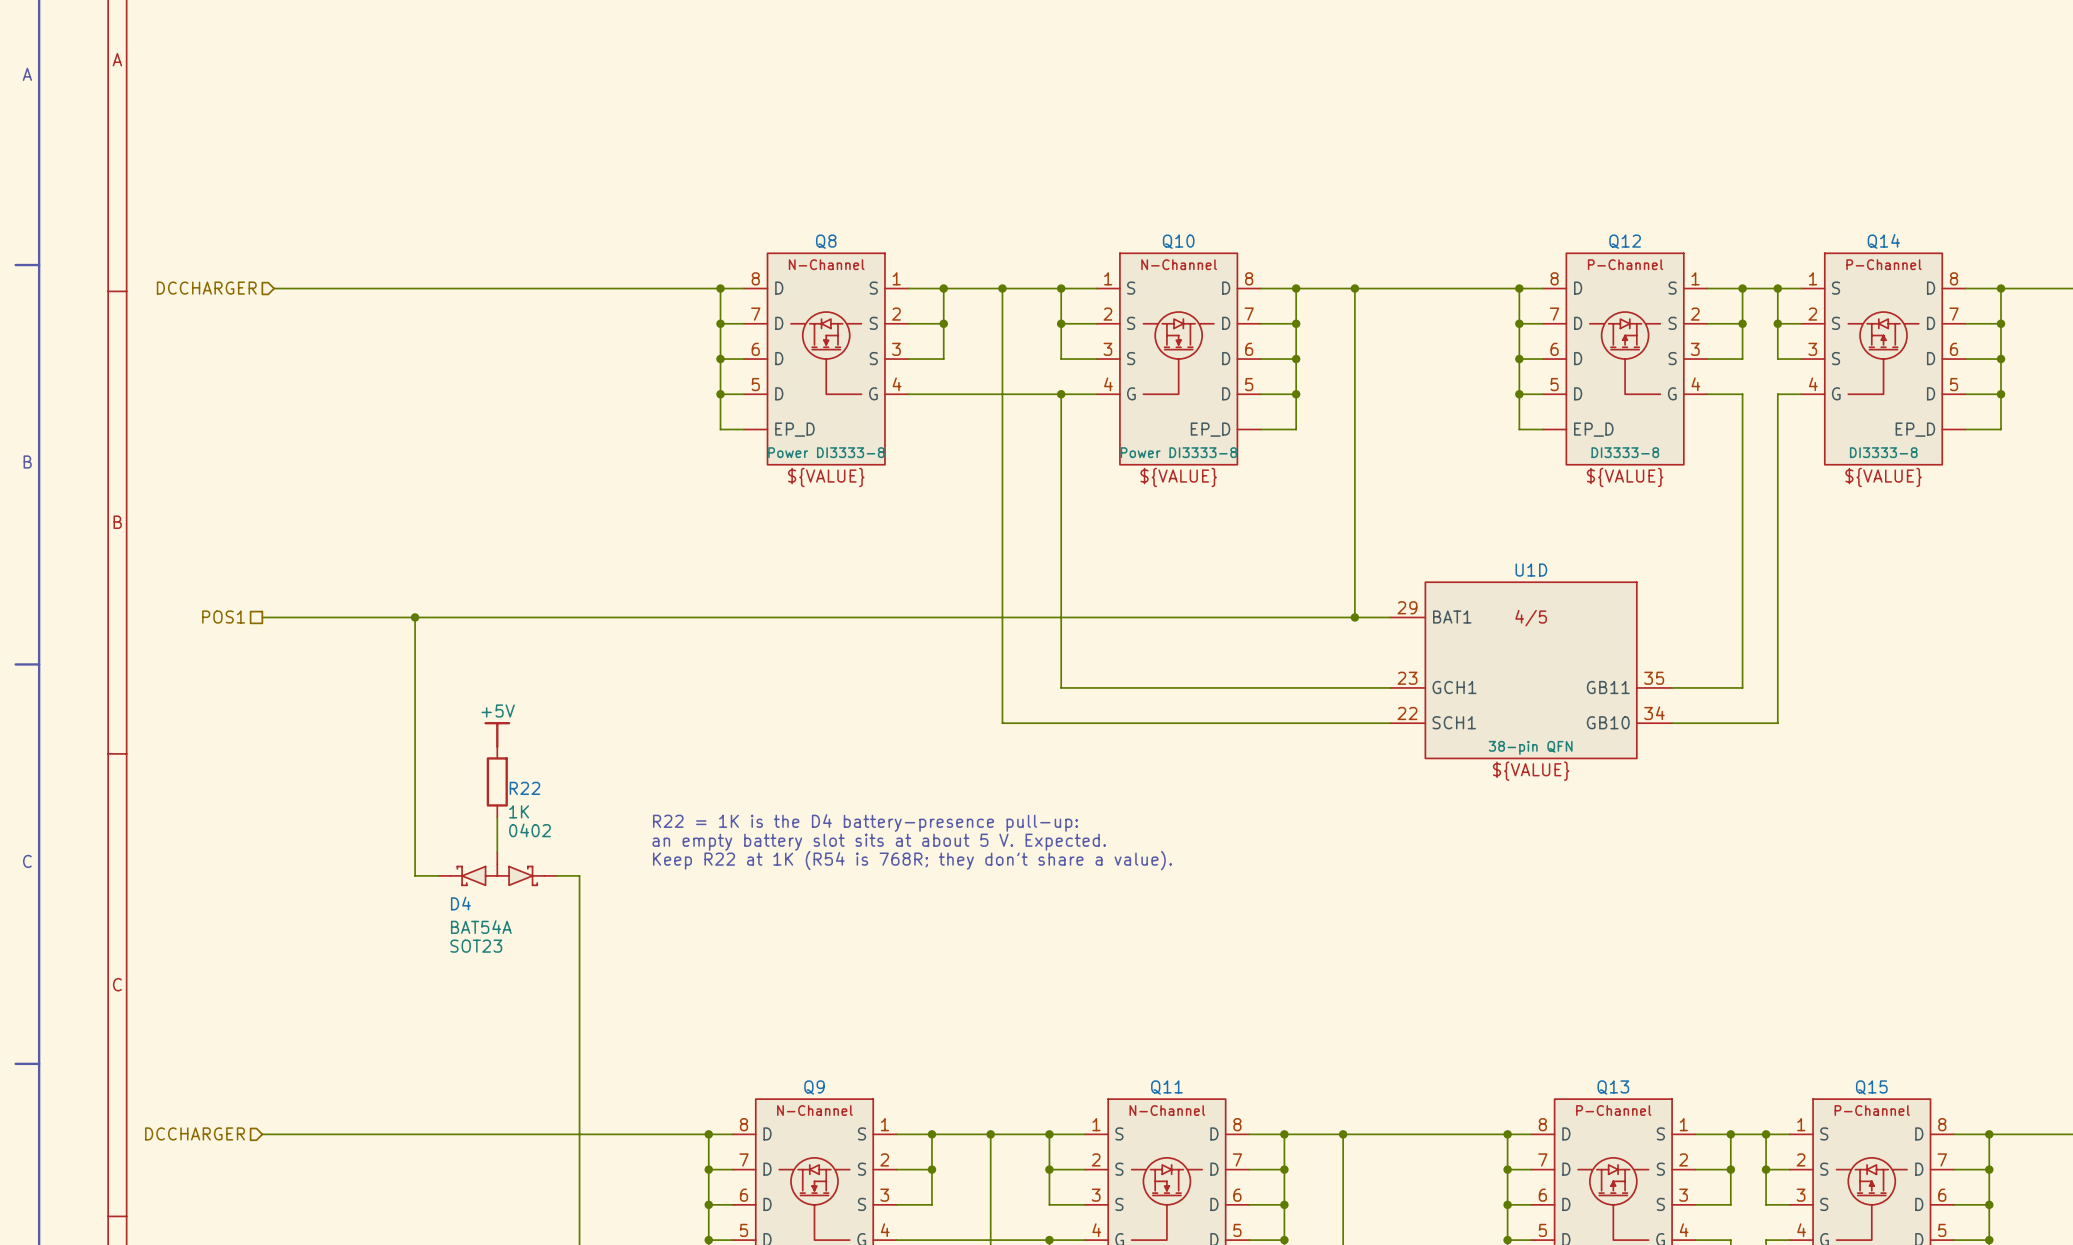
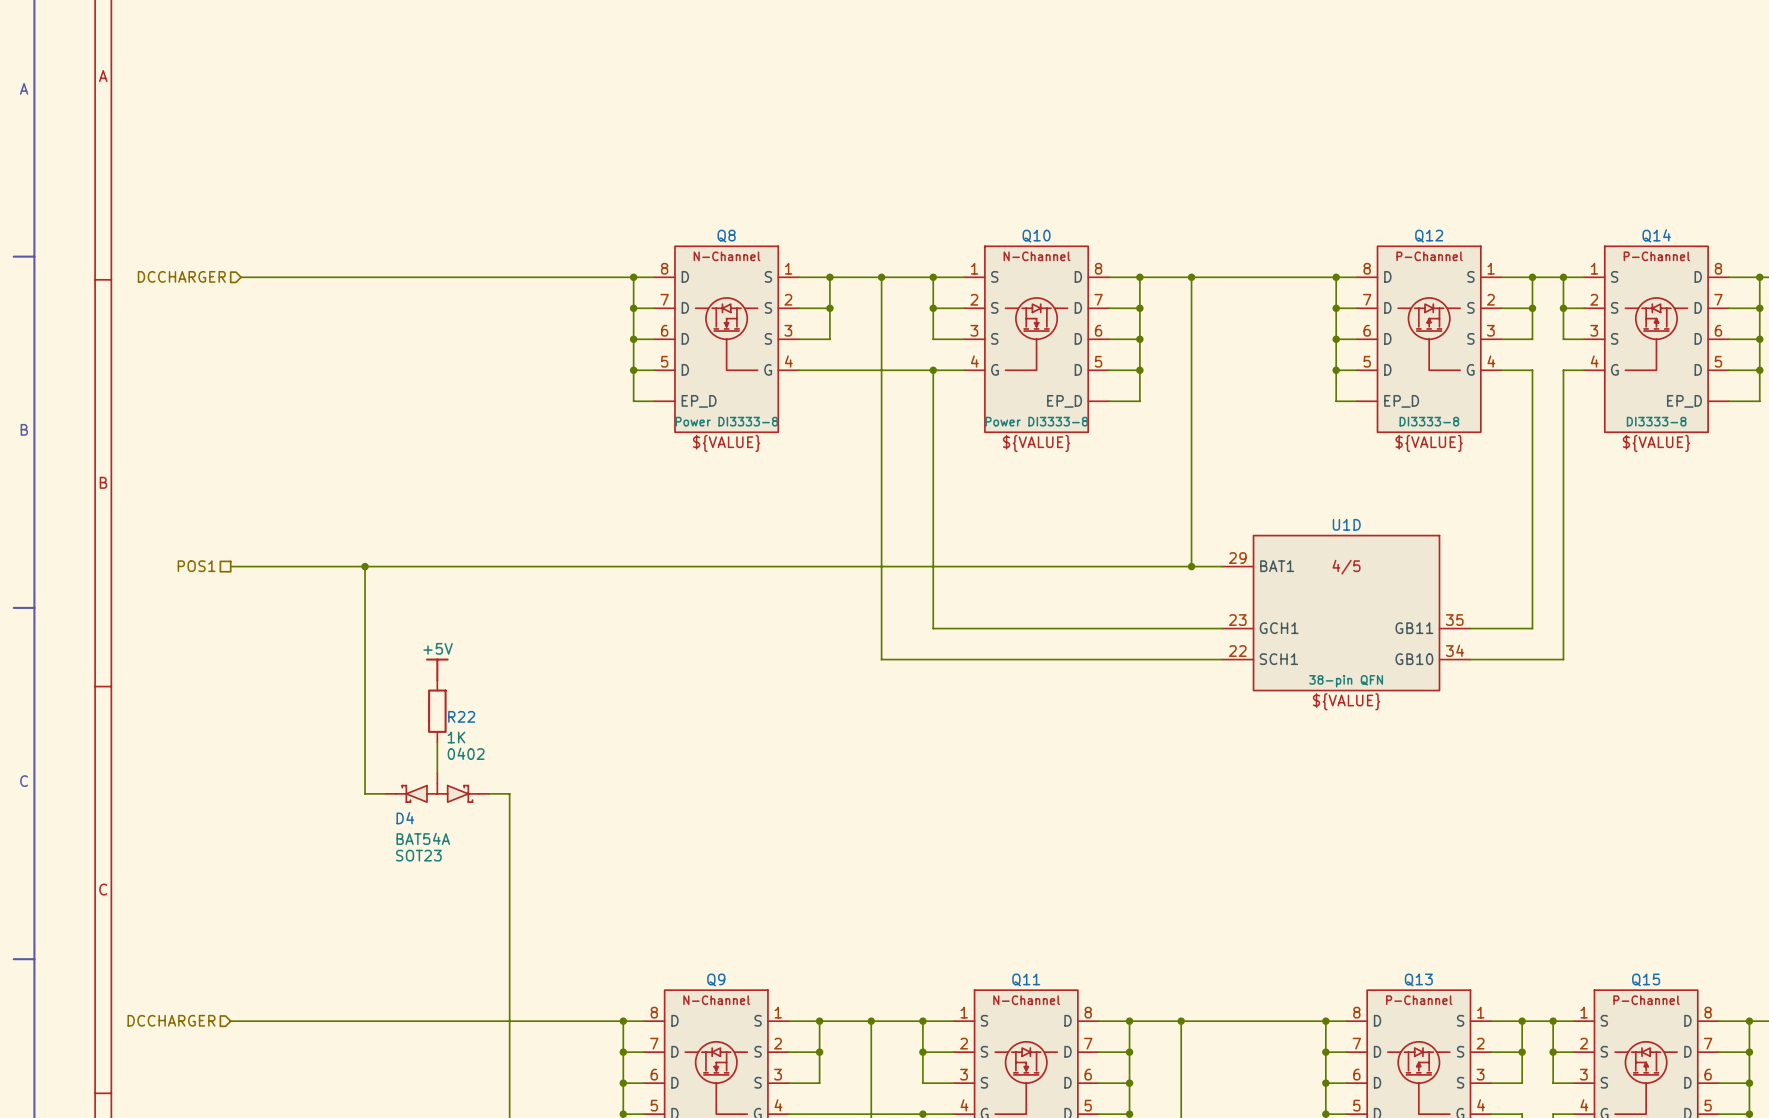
text: R22 = 1K is the D4 battery-presence pull-up: (865, 822) -> none
text: an empty battery slot sits at about 5 V. Expected. (879, 842) -> none
text: Keep R22 at 1K (R54 is 768R; they don't share a value). (912, 860) -> none

